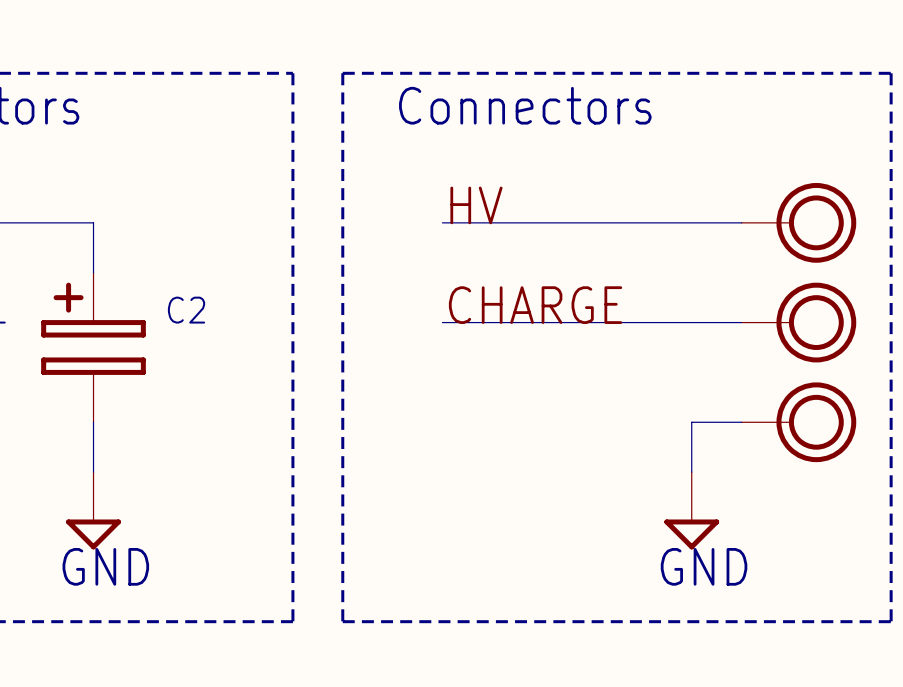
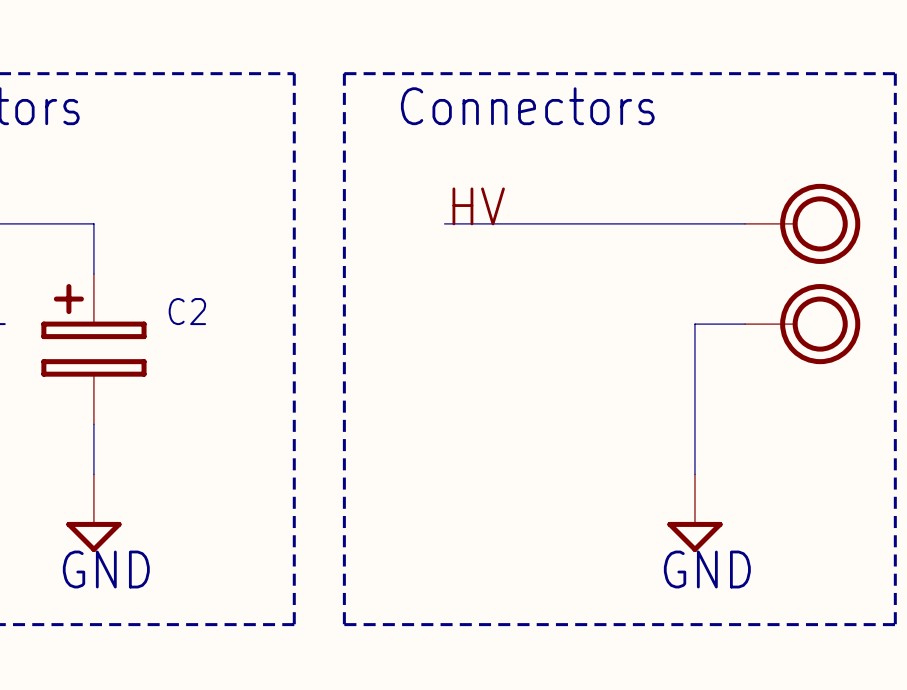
label: CHARGE (535, 305) -> none
wire: (442, 322) (691, 322) -> none
wire: (691, 422) (741, 422) -> (694, 424) (694, 324)
part: (798, 422) -> none

